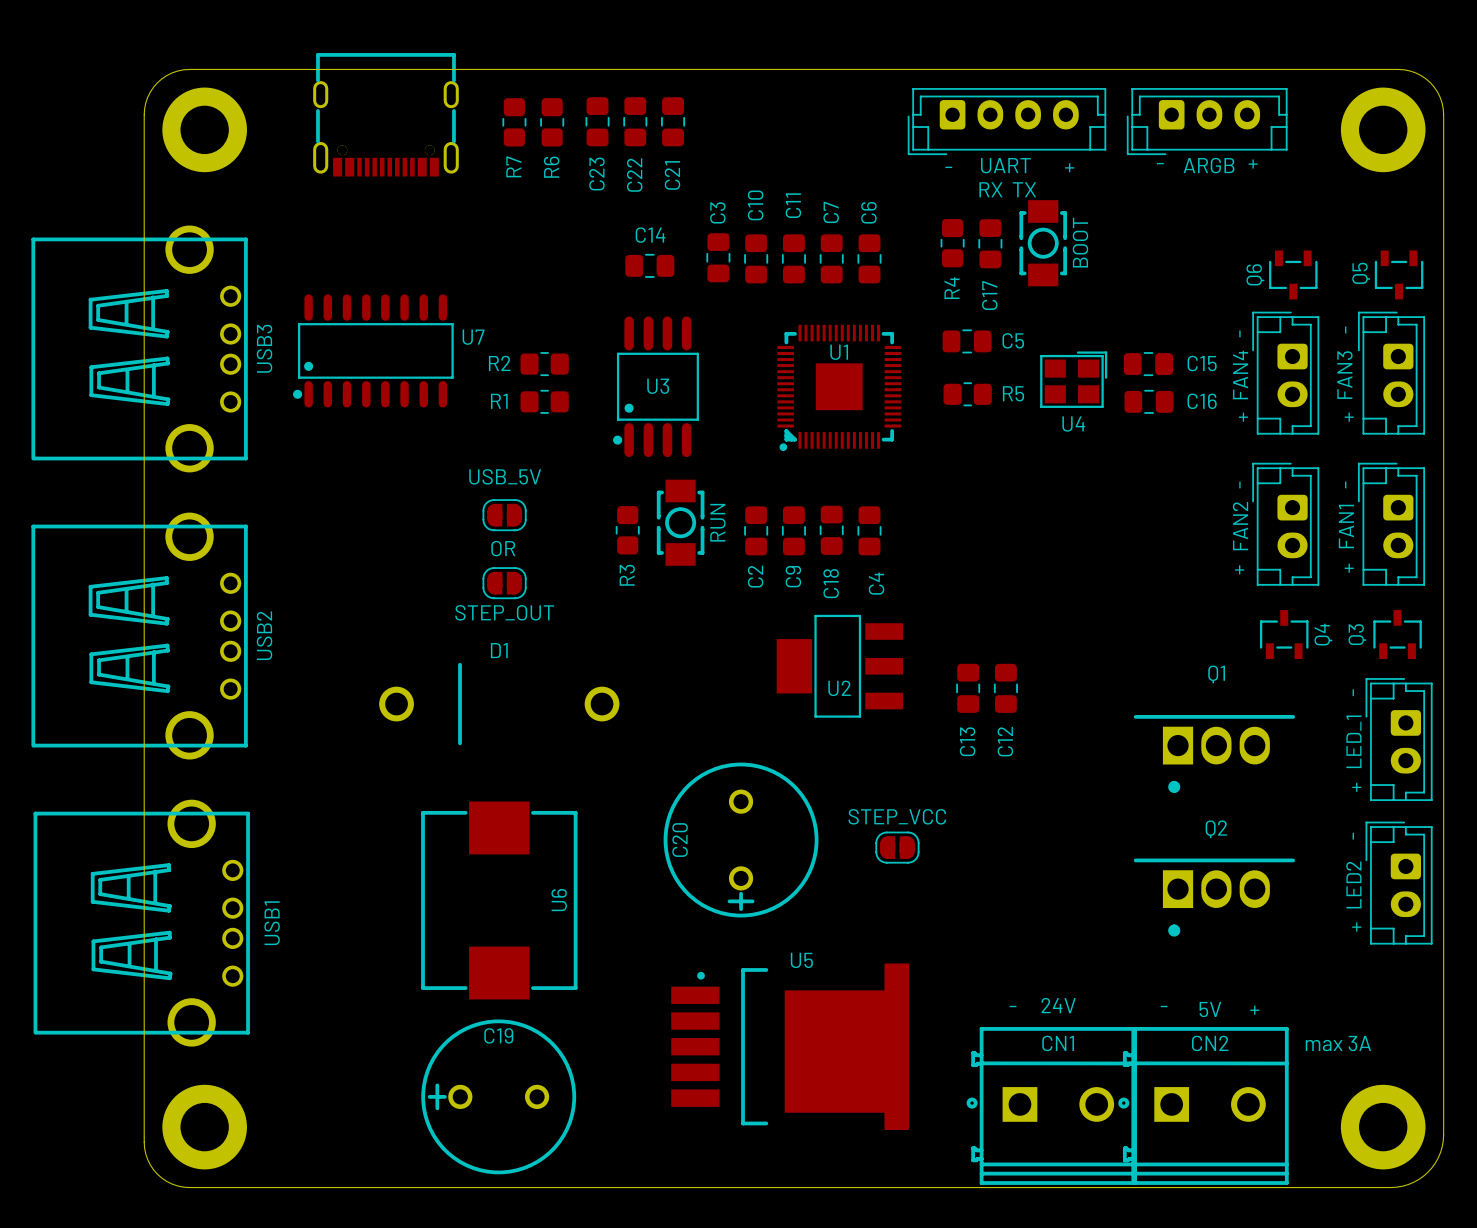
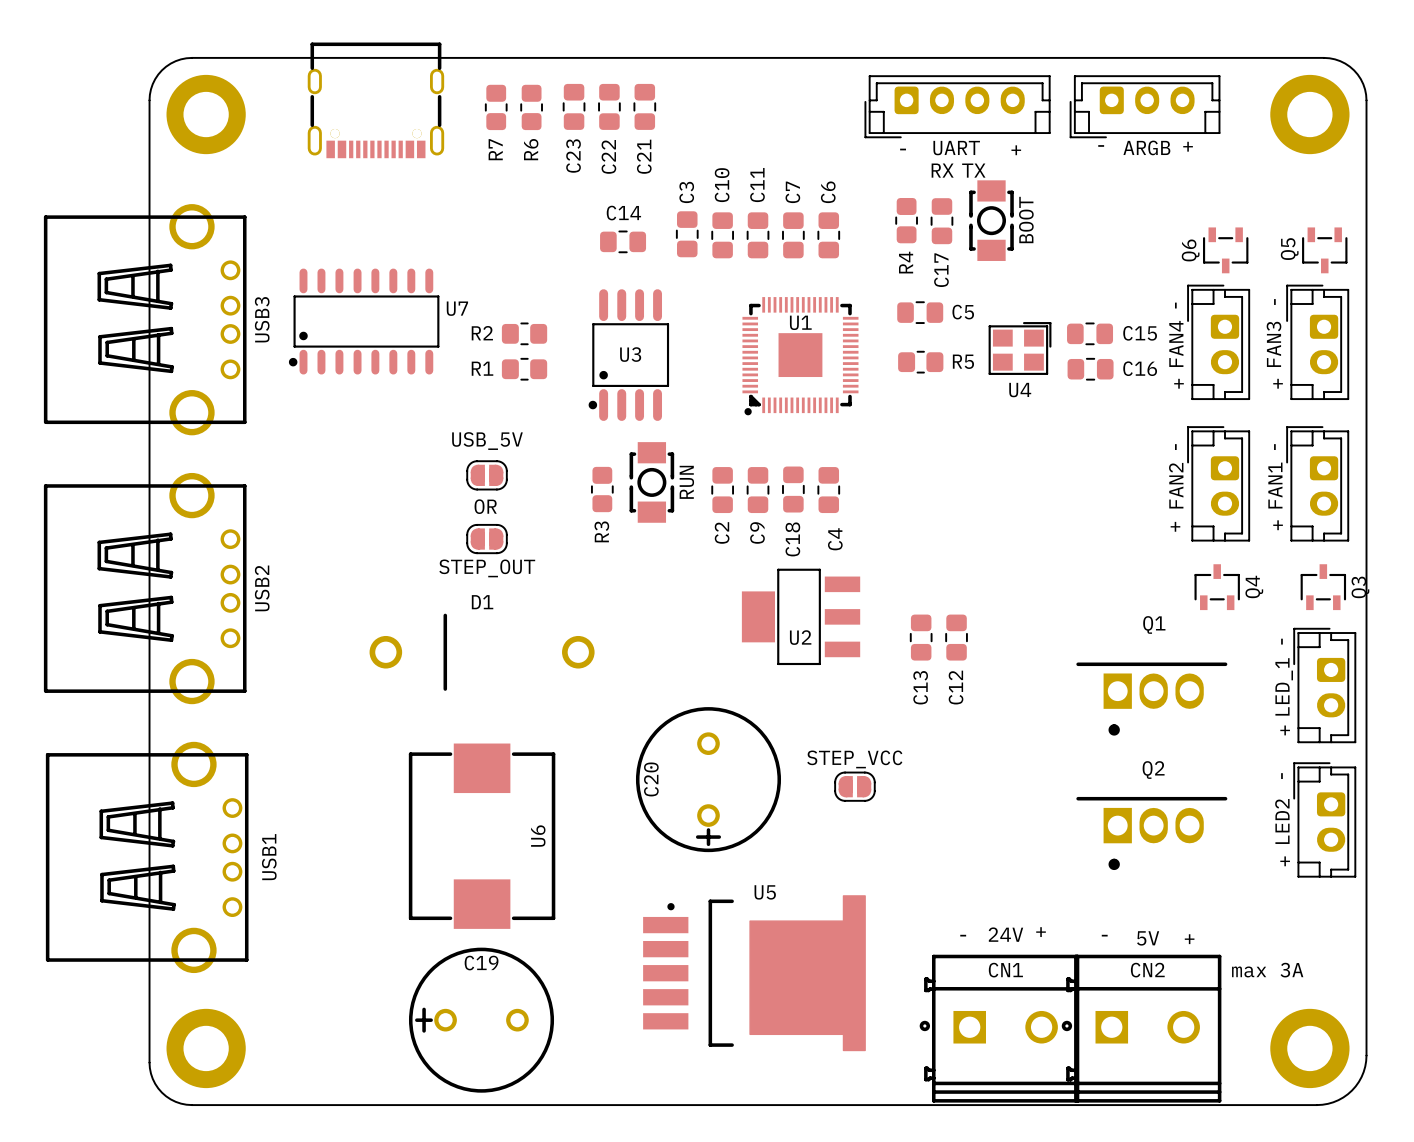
Q3 name position: Q3 (1357, 634) -> Q3 (1360, 587)
text: none -> + (1041, 932)

